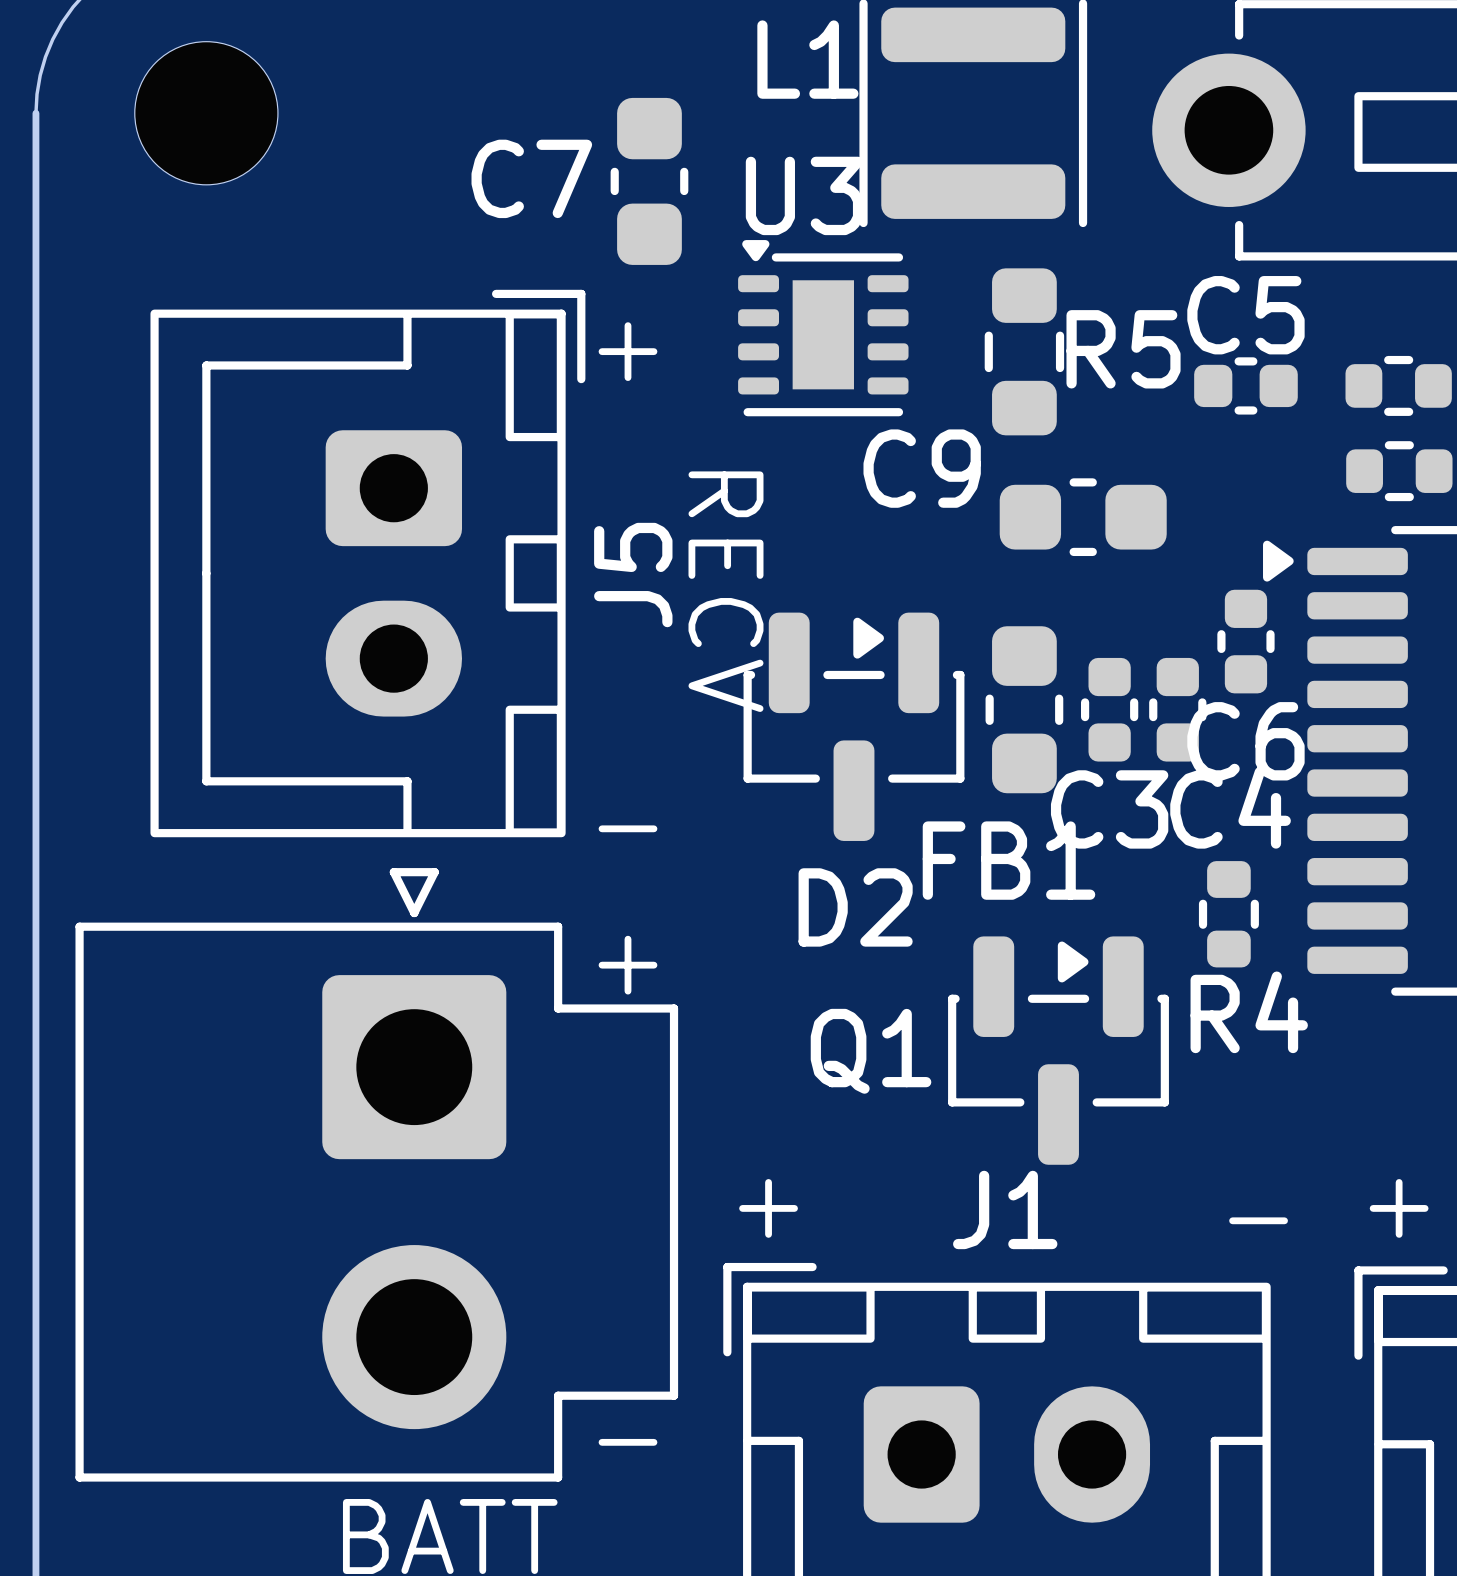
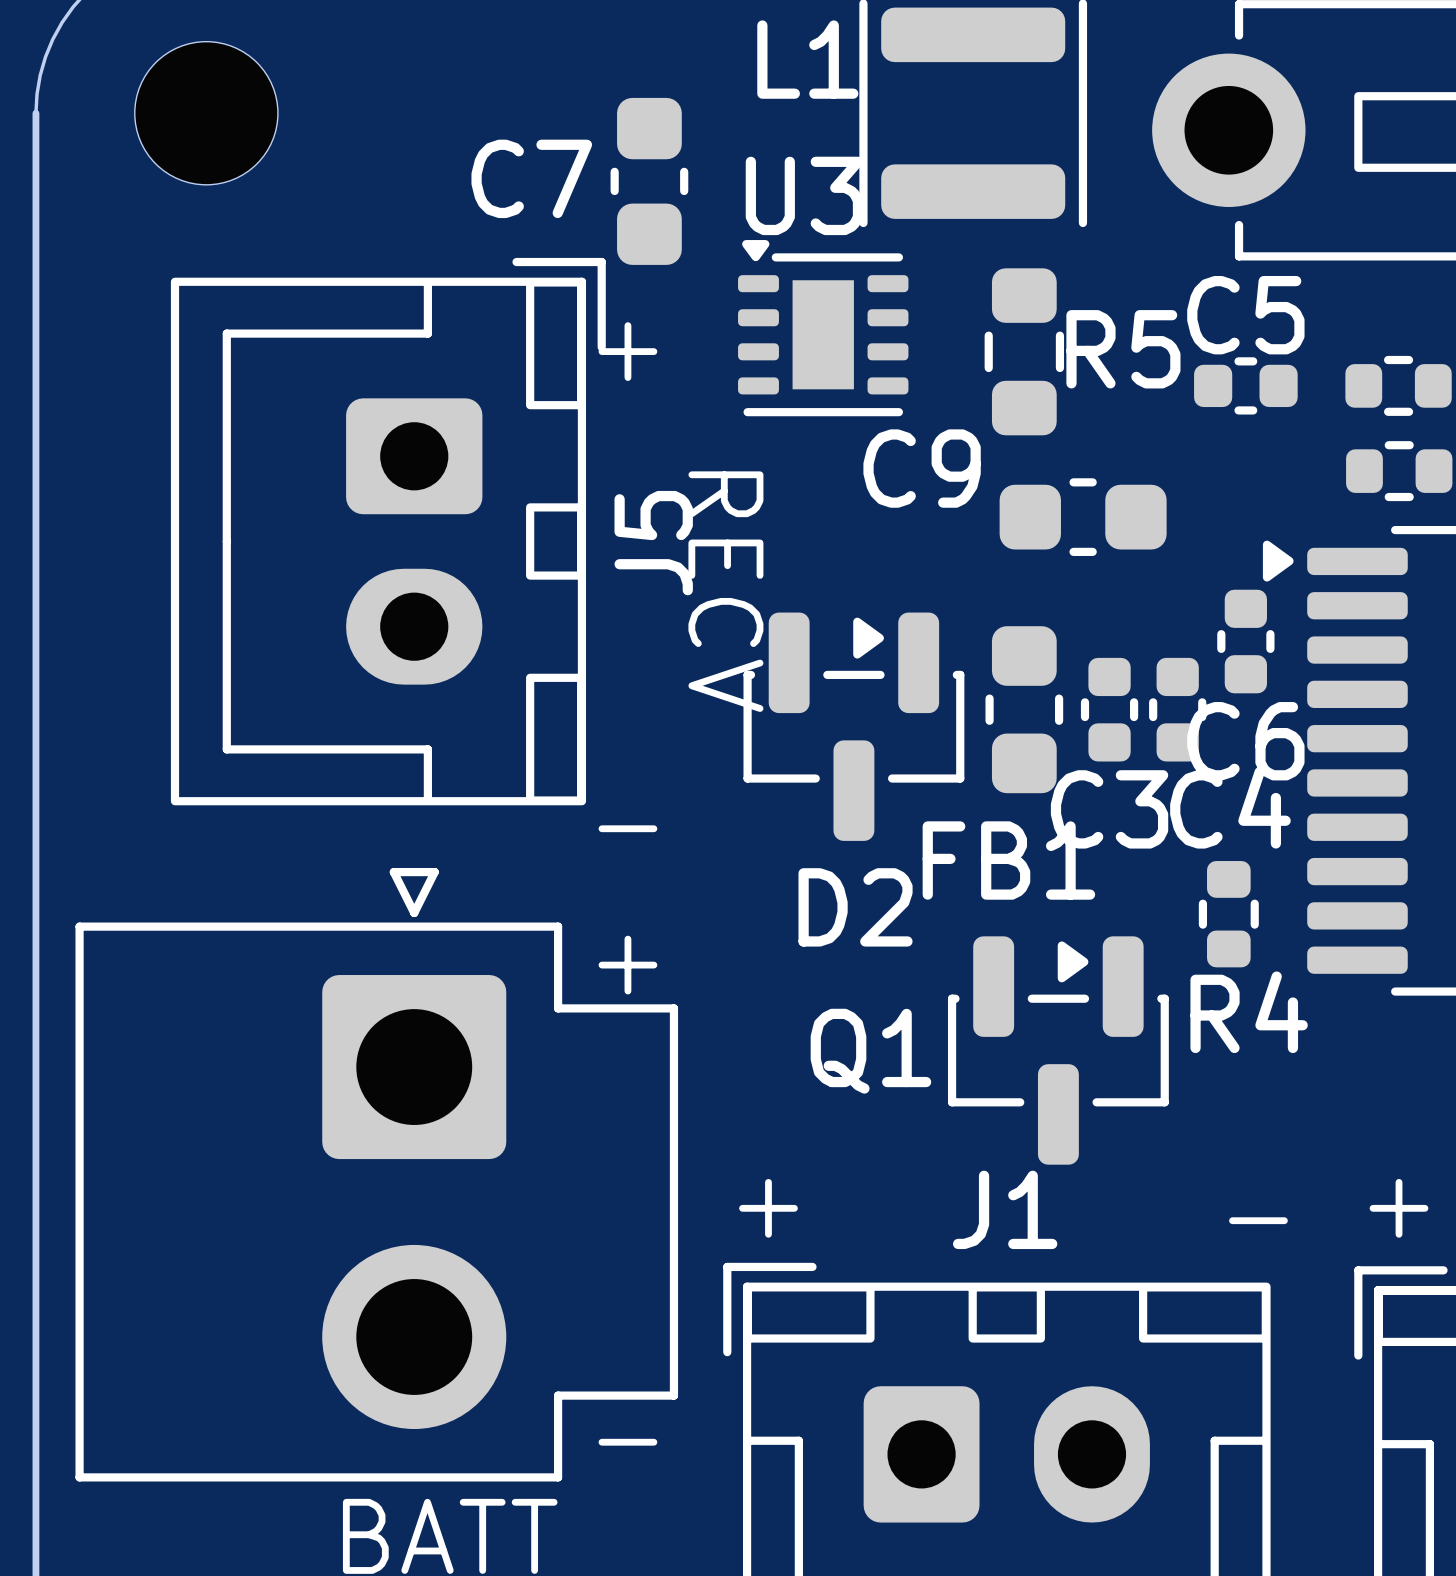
J5 position: (367, 563) -> (388, 531)

